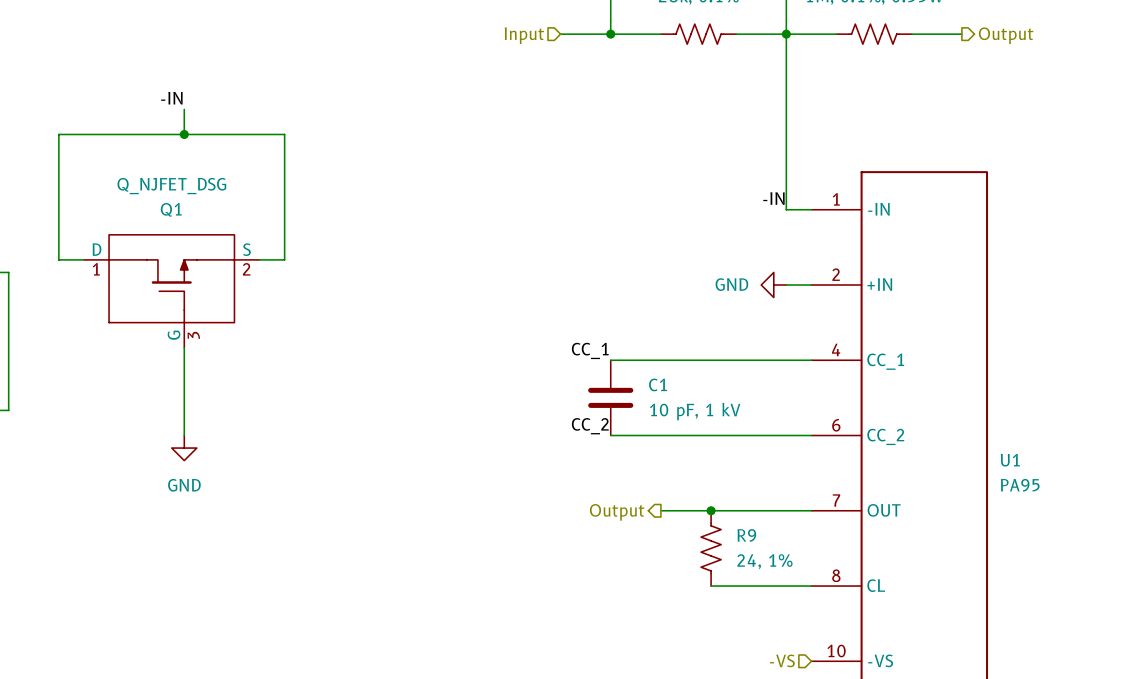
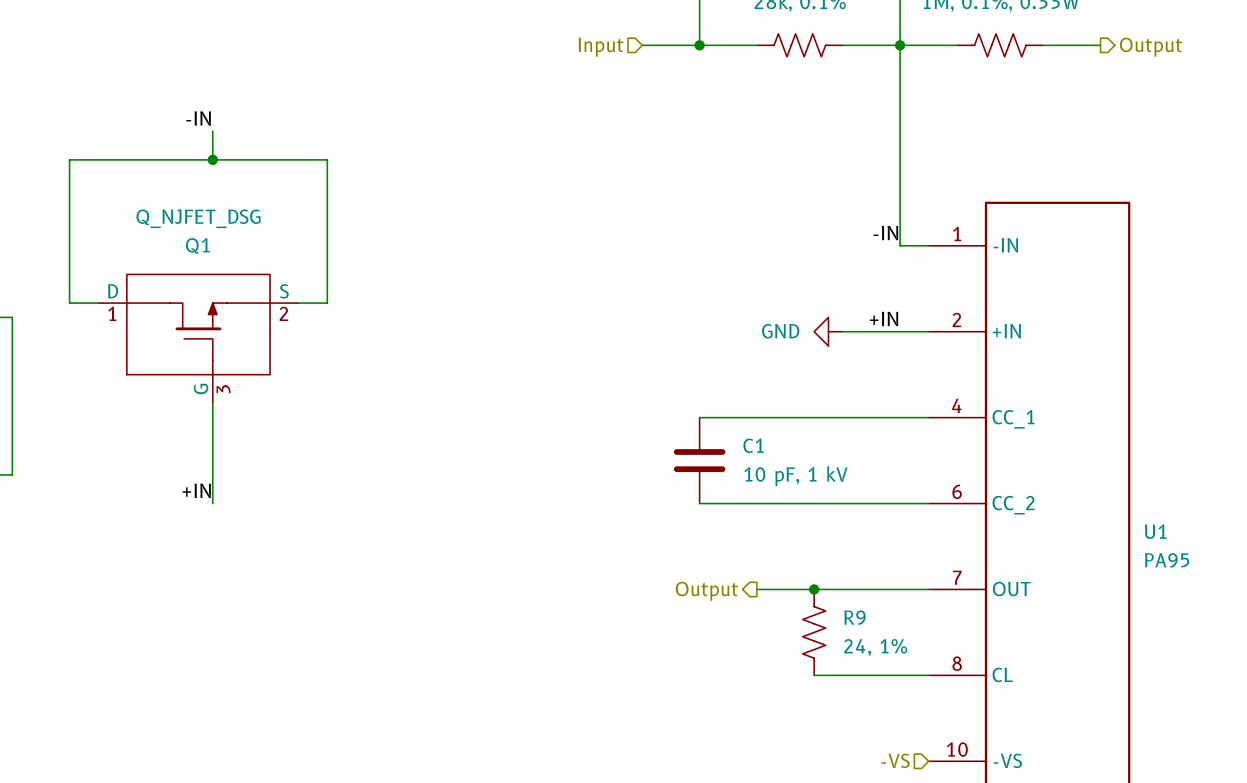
label: none -> +IN (884, 318)
wire: none -> (842, 331) (900, 331)
power symbol position: GND (773, 285) -> GND (828, 331)
label: CC_1 (590, 350) -> none
label: none -> +IN (196, 490)
label: CC_2 (590, 426) -> none
power symbol: GND (184, 448) -> none

